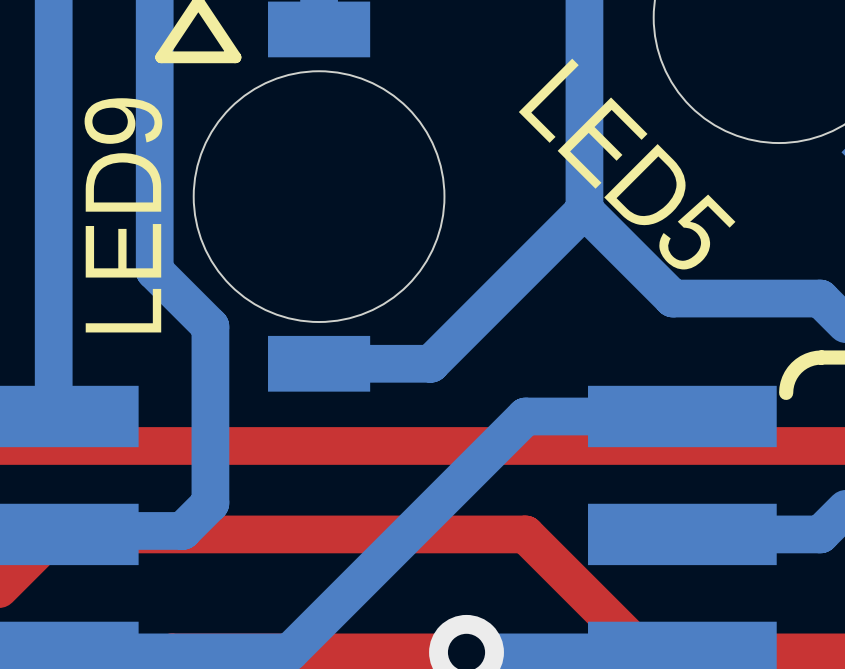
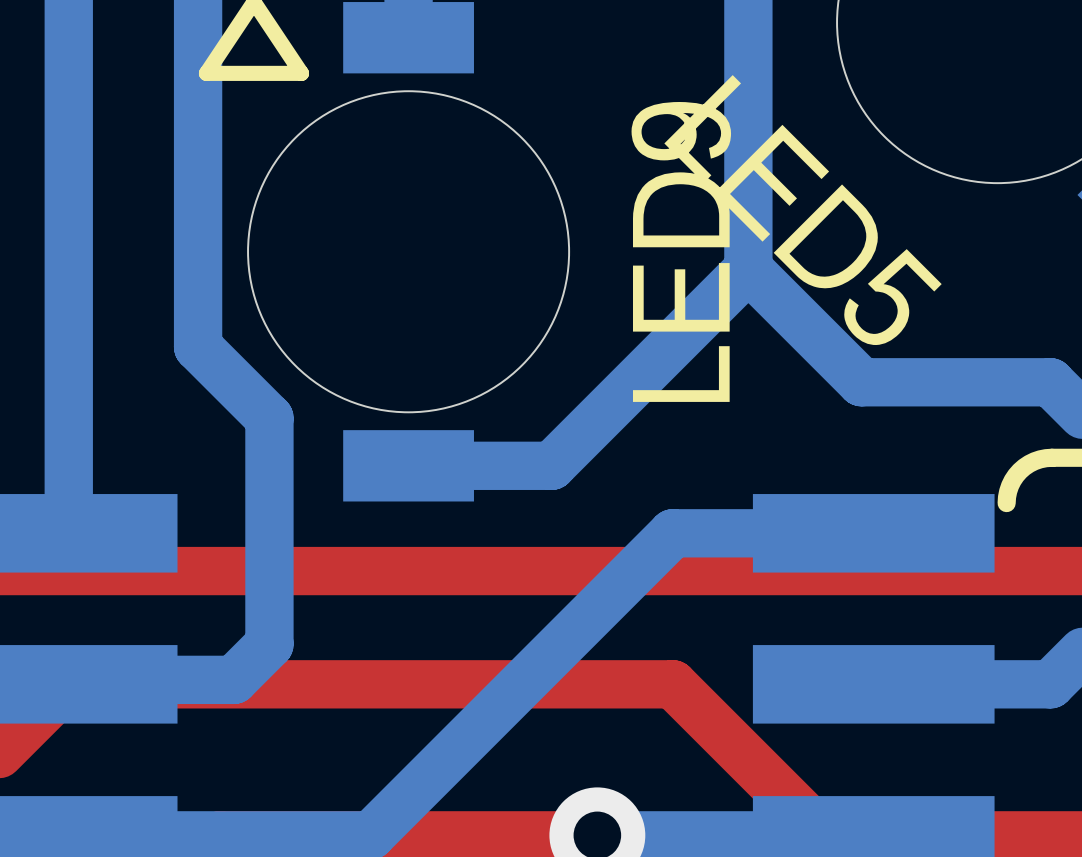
LED9 name position: LED9 (123, 215) -> LED9 (681, 251)

